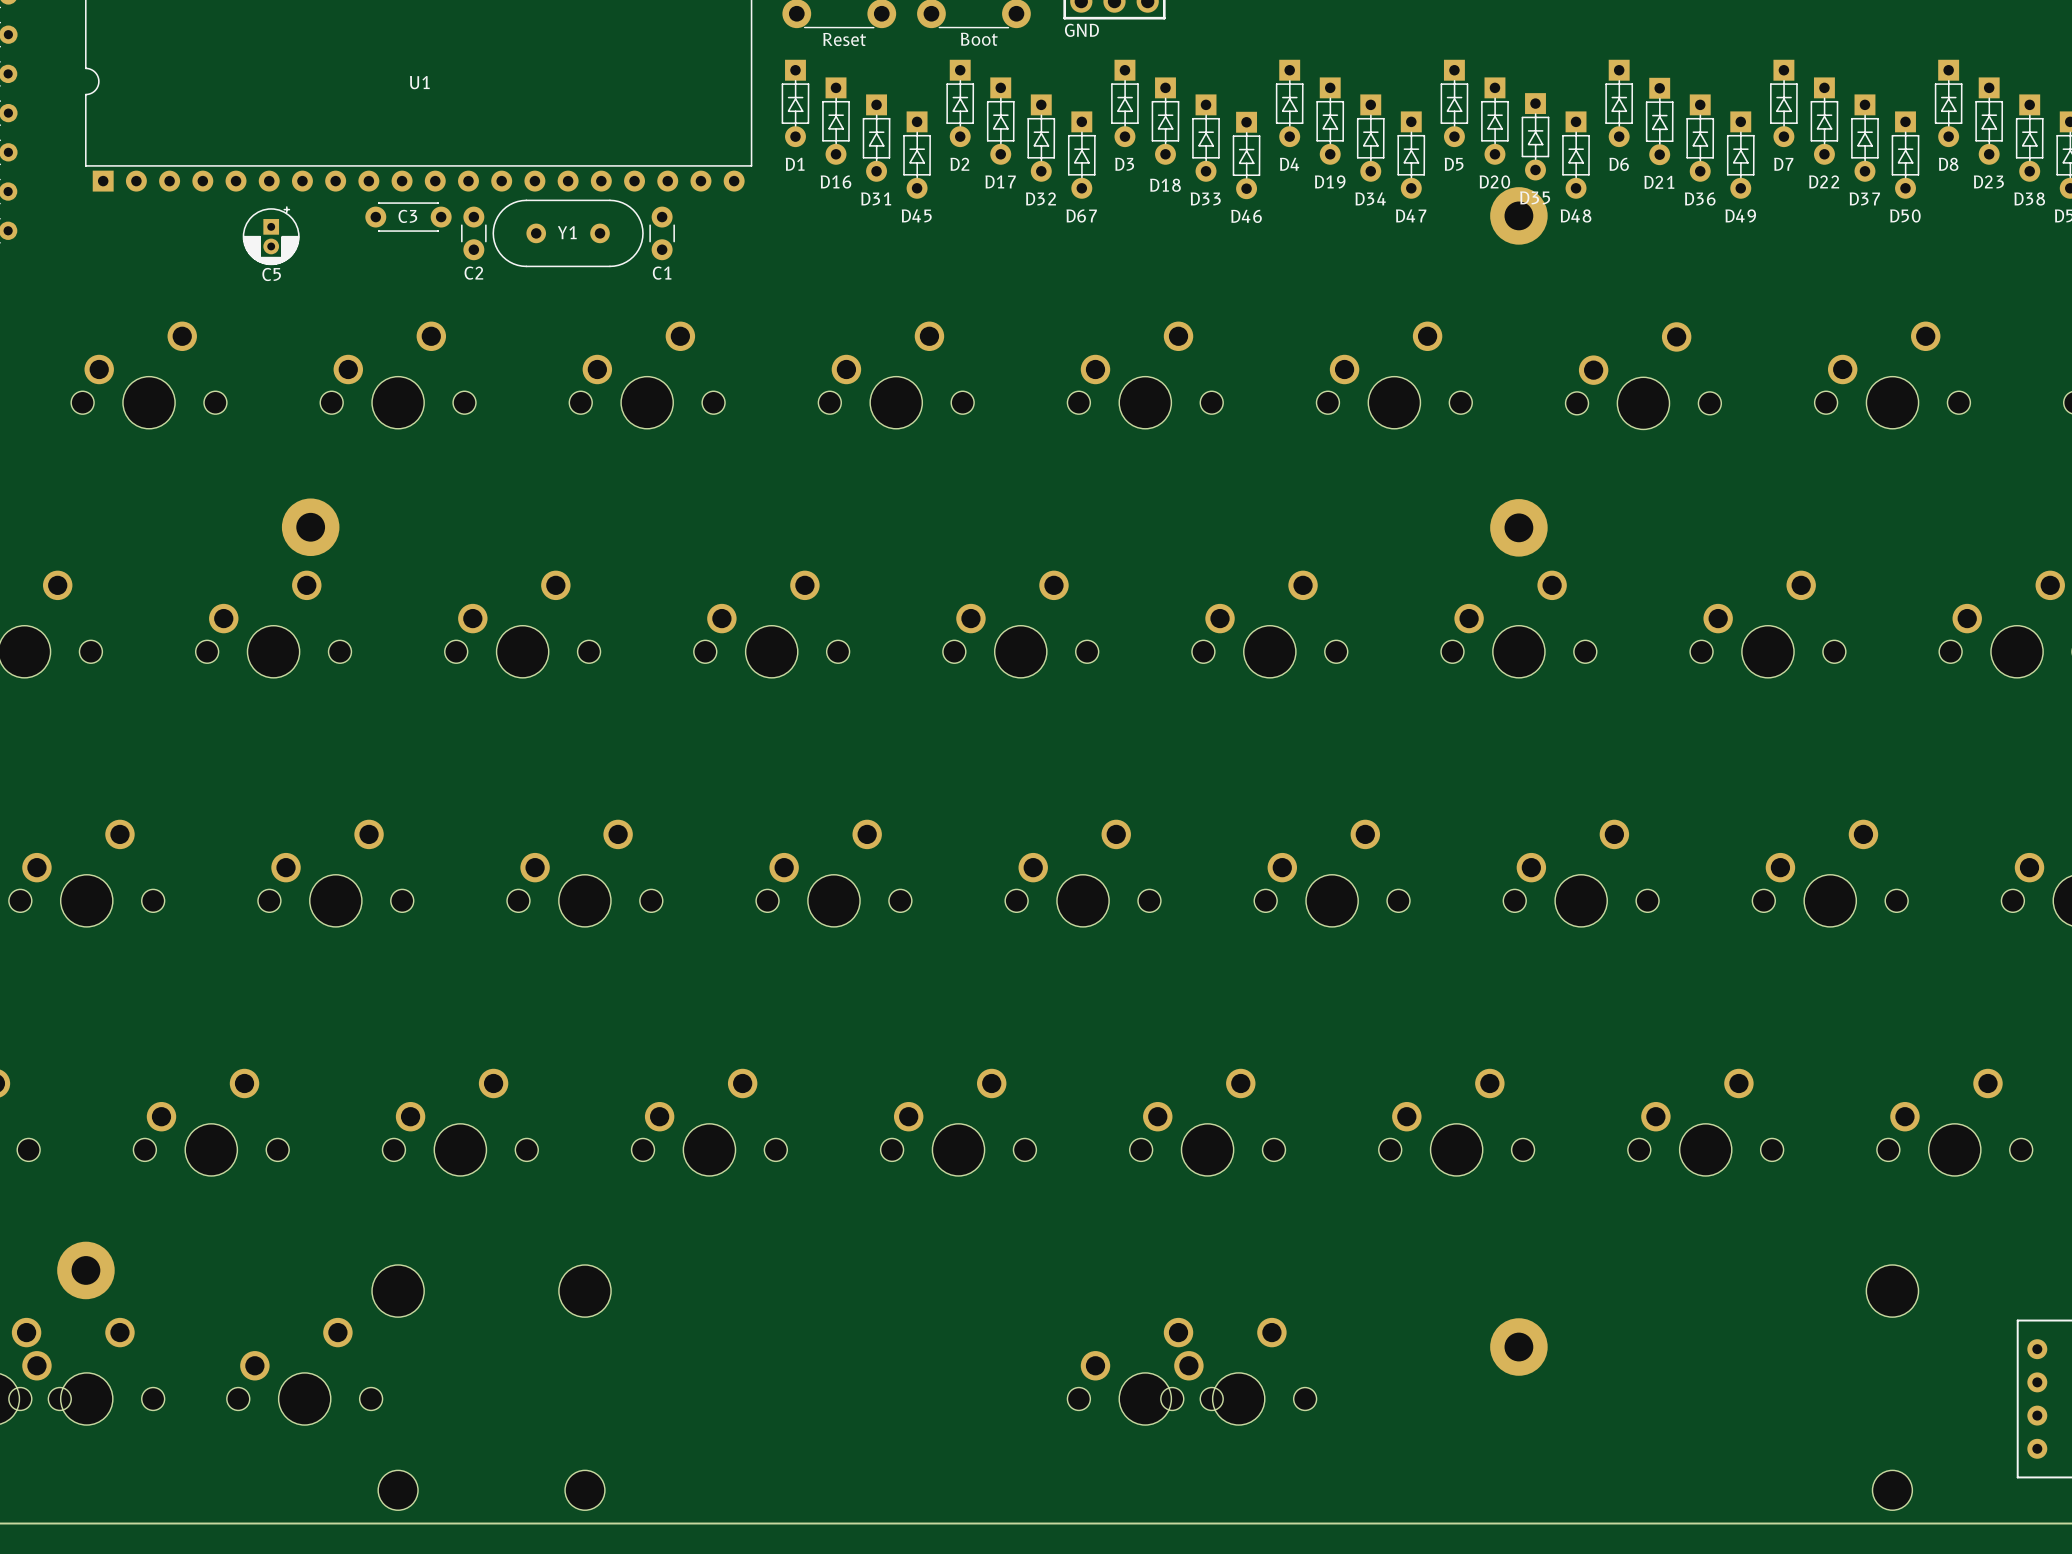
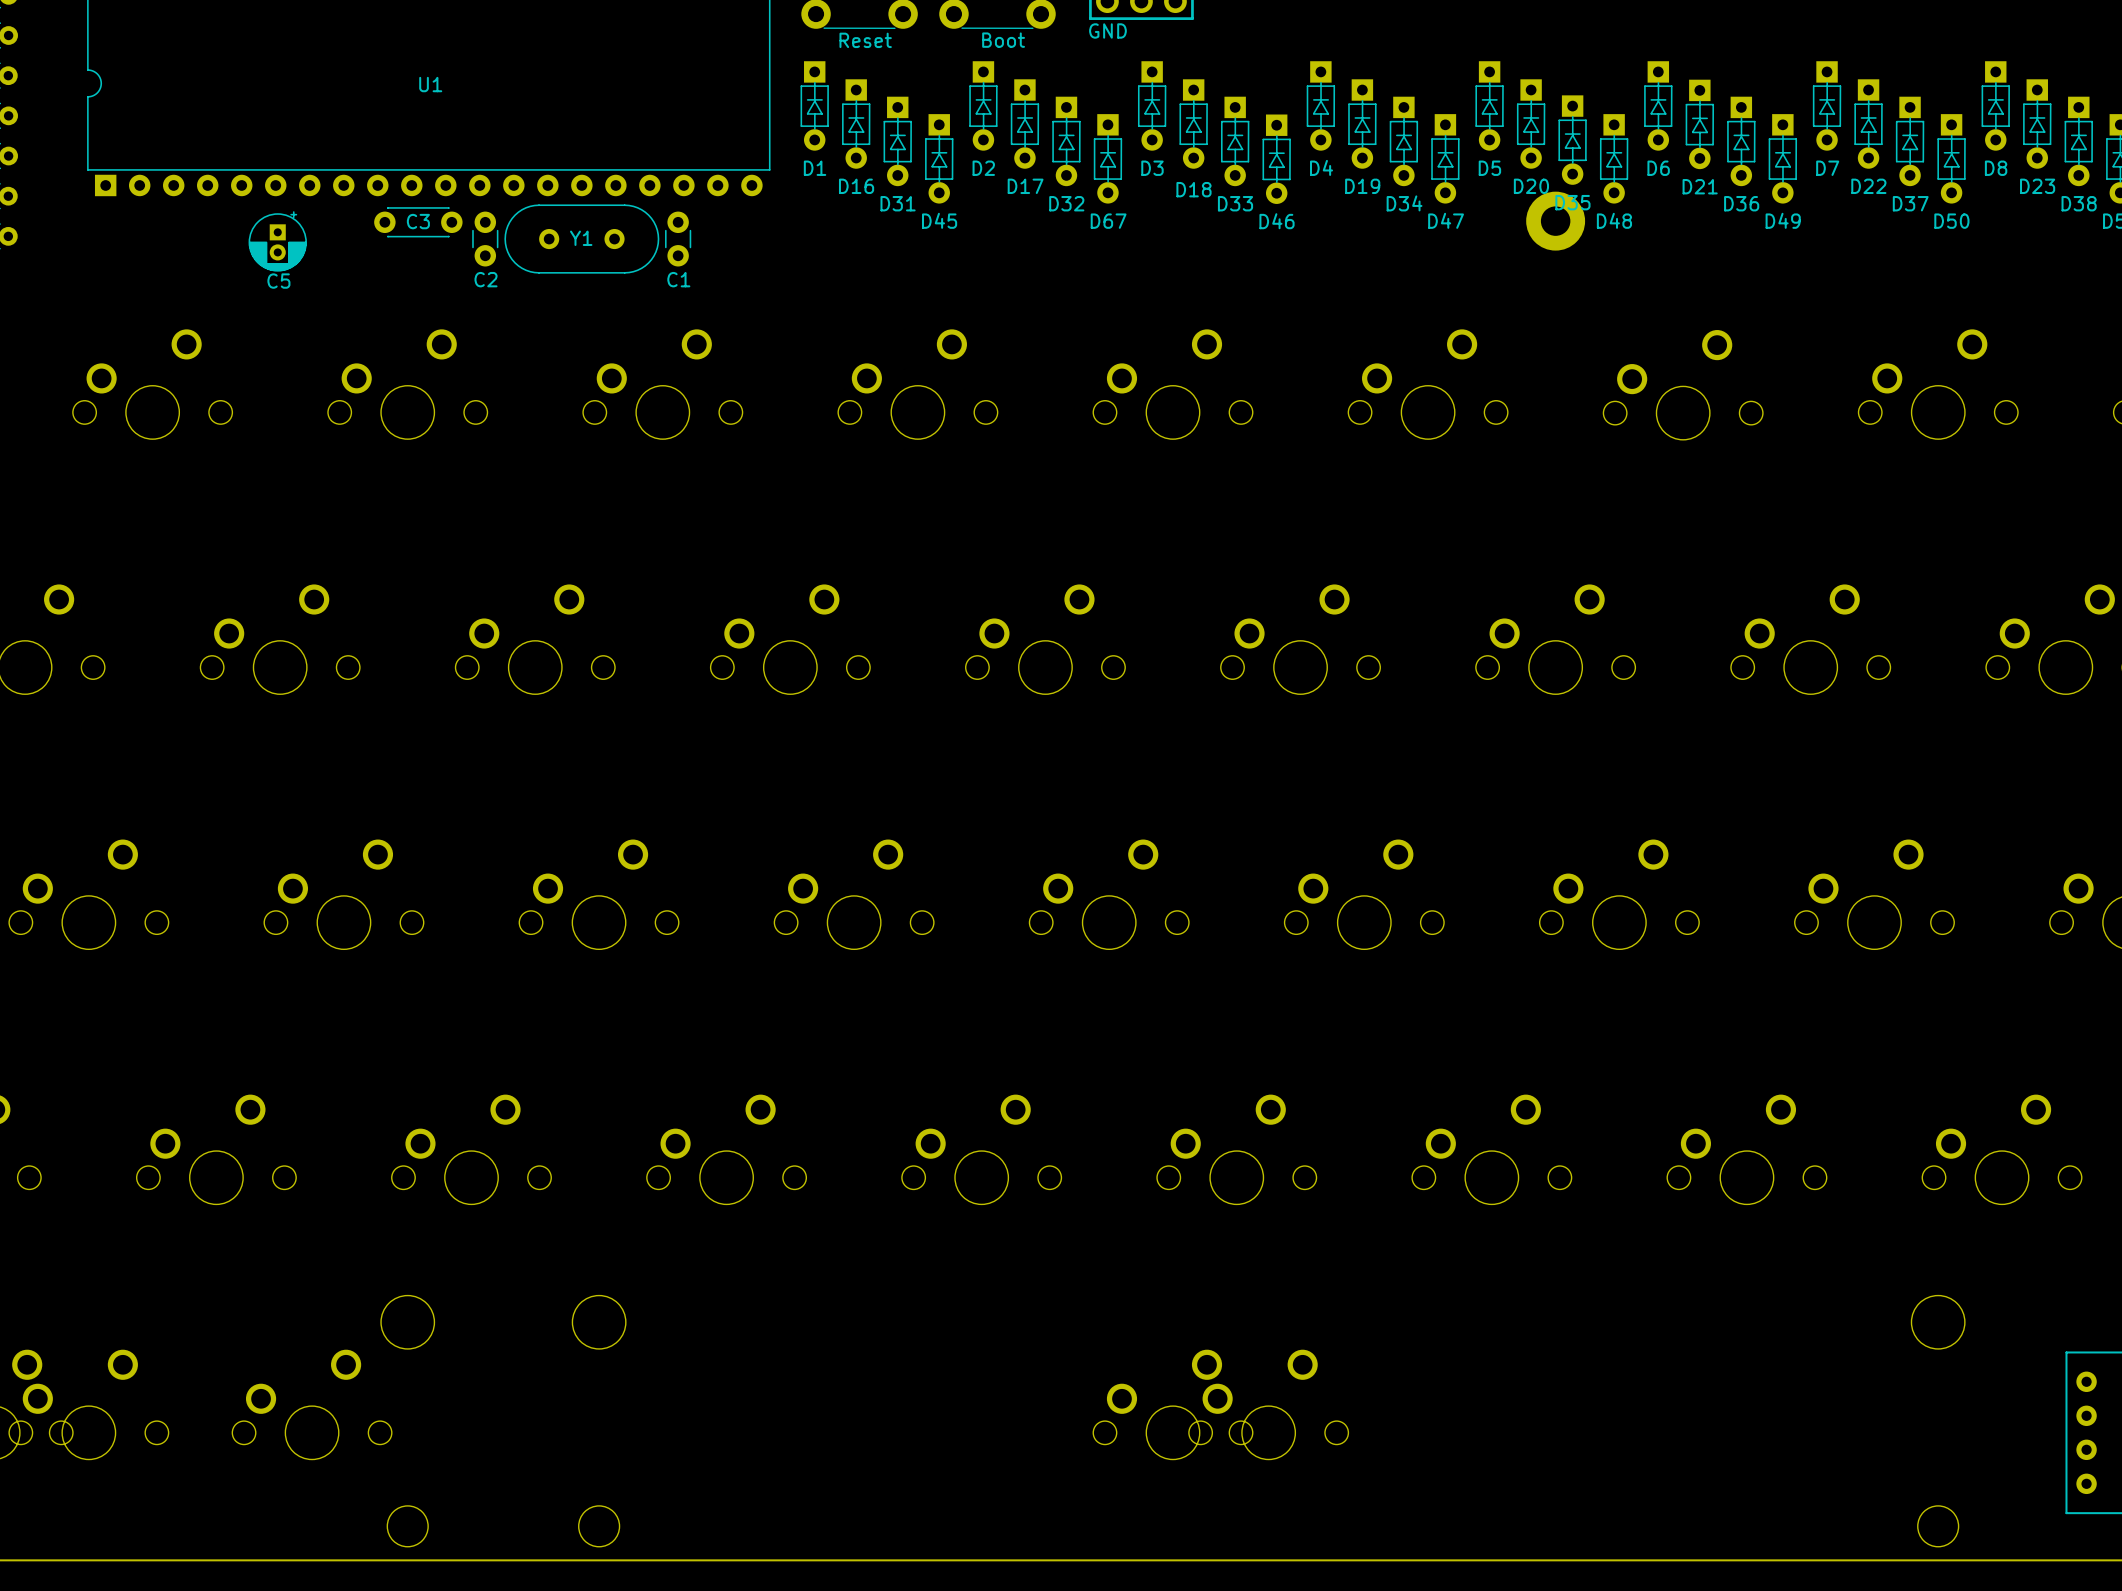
part: (310, 527) -> none
part: (1518, 527) -> none
part: (85, 1270) -> none
part: (1518, 1347) -> none

